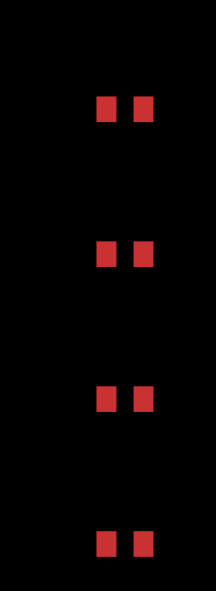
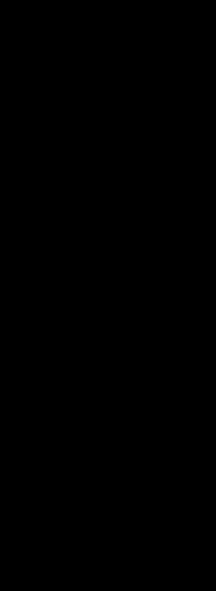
part: (124, 109) -> none
part: (124, 254) -> none
part: (124, 399) -> none
part: (124, 544) -> none

